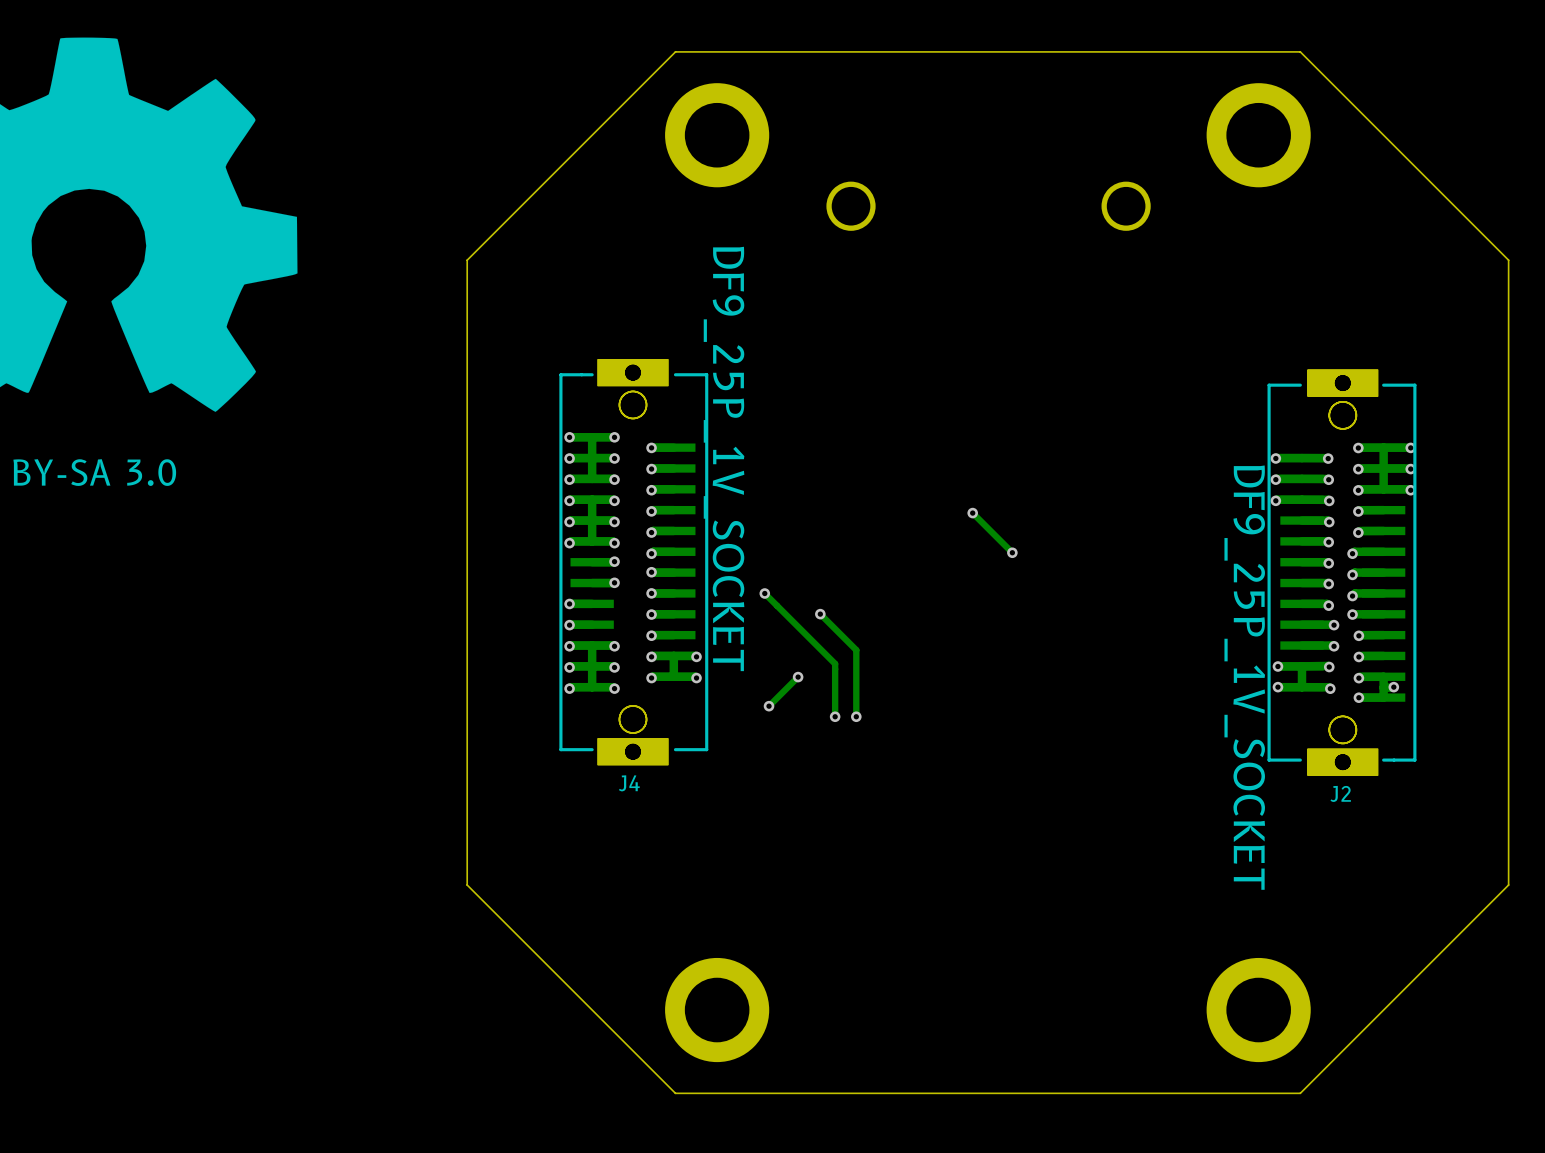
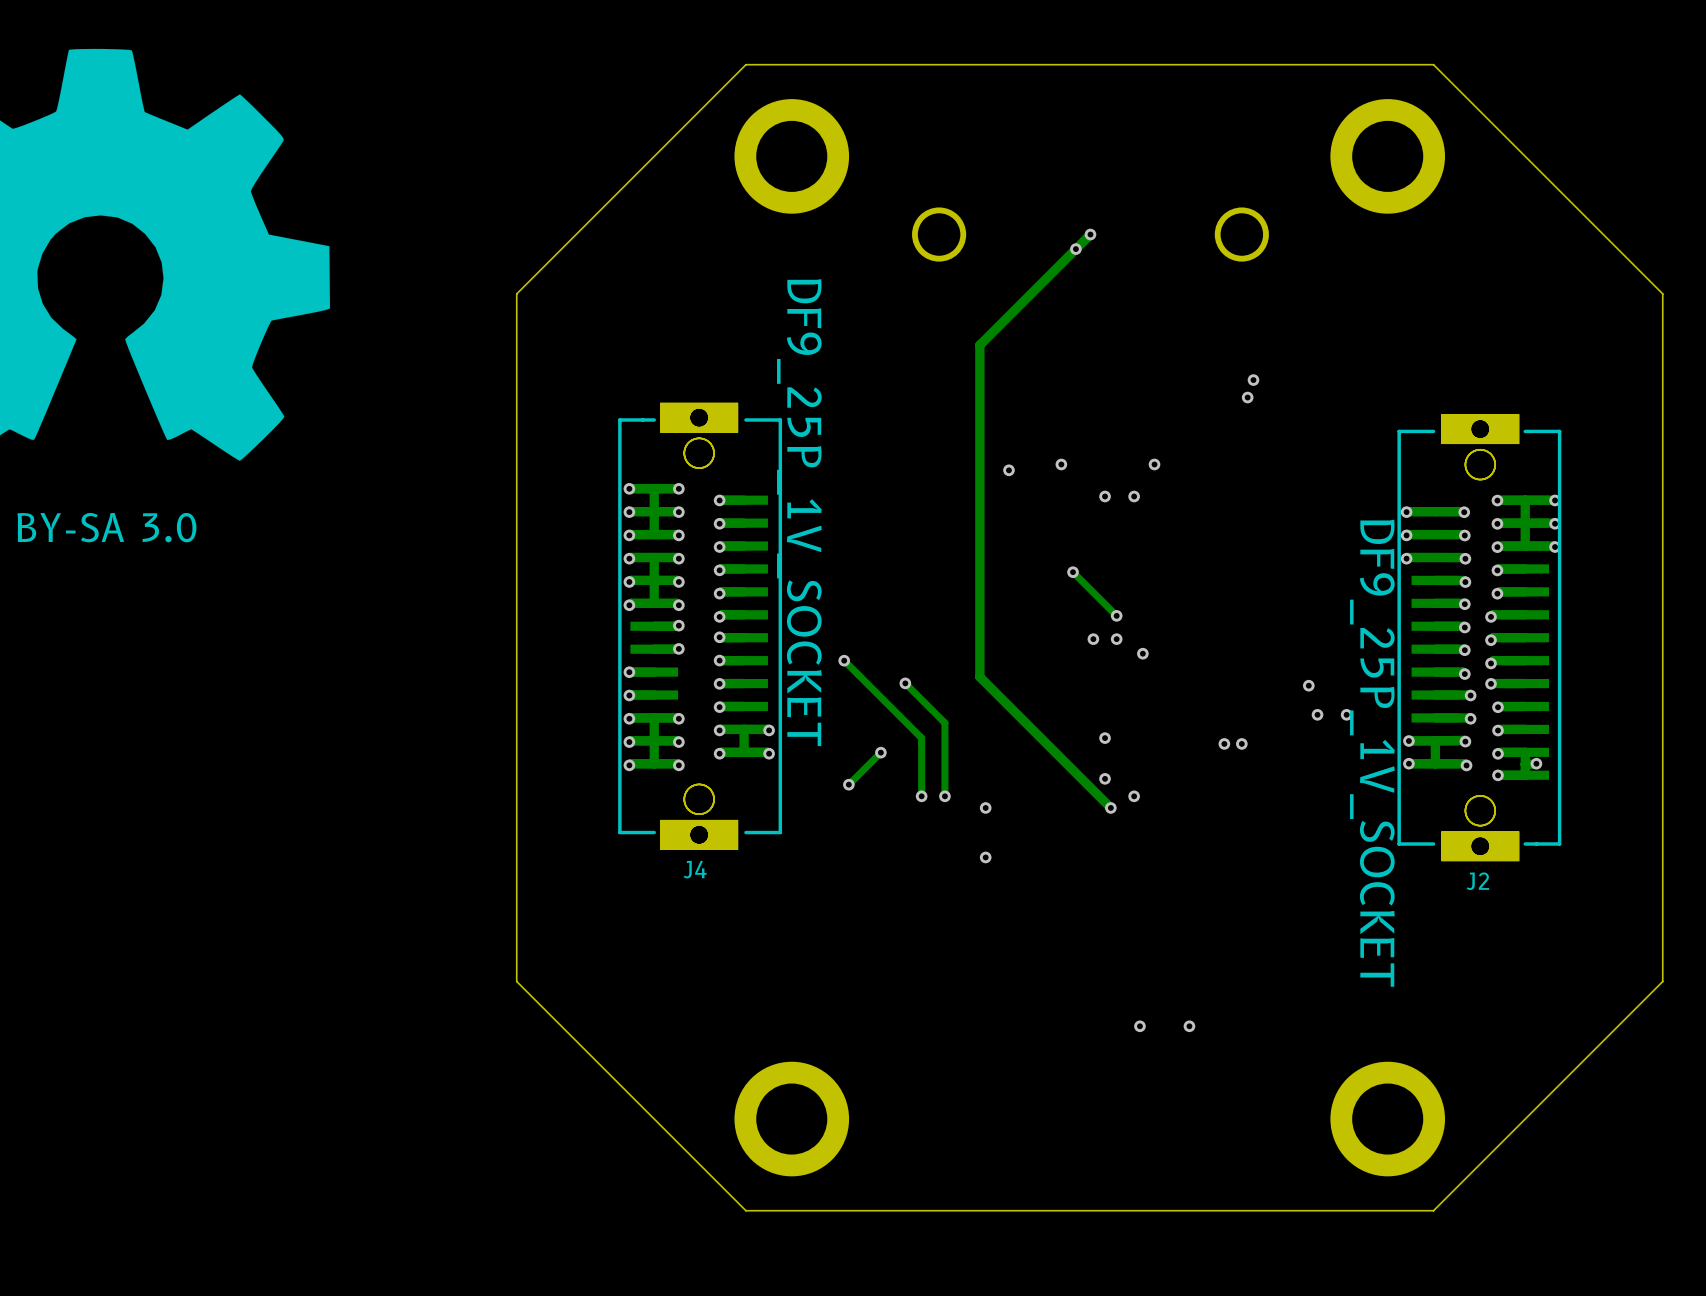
track: none -> (1090, 234) (979, 345) (979, 676) (1110, 807)
via: none -> (1090, 234)
via: none -> (1075, 249)
via: none -> (1253, 380)
via: none -> (1247, 397)
via: none -> (1061, 464)
via: none -> (1154, 464)
via: none -> (1008, 470)
via: none -> (1105, 496)
via: none -> (1134, 496)
via: none -> (1093, 639)
via: none -> (1116, 639)
via: none -> (1142, 653)
via: none -> (1308, 685)
via: none -> (1317, 714)
via: none -> (1346, 714)
via: none -> (1105, 738)
via: none -> (1224, 743)
via: none -> (1241, 743)
via: none -> (1105, 778)
via: none -> (1134, 796)
via: none -> (985, 807)
via: none -> (1110, 807)
via: none -> (985, 857)
via: none -> (1139, 1026)
via: none -> (1189, 1026)

